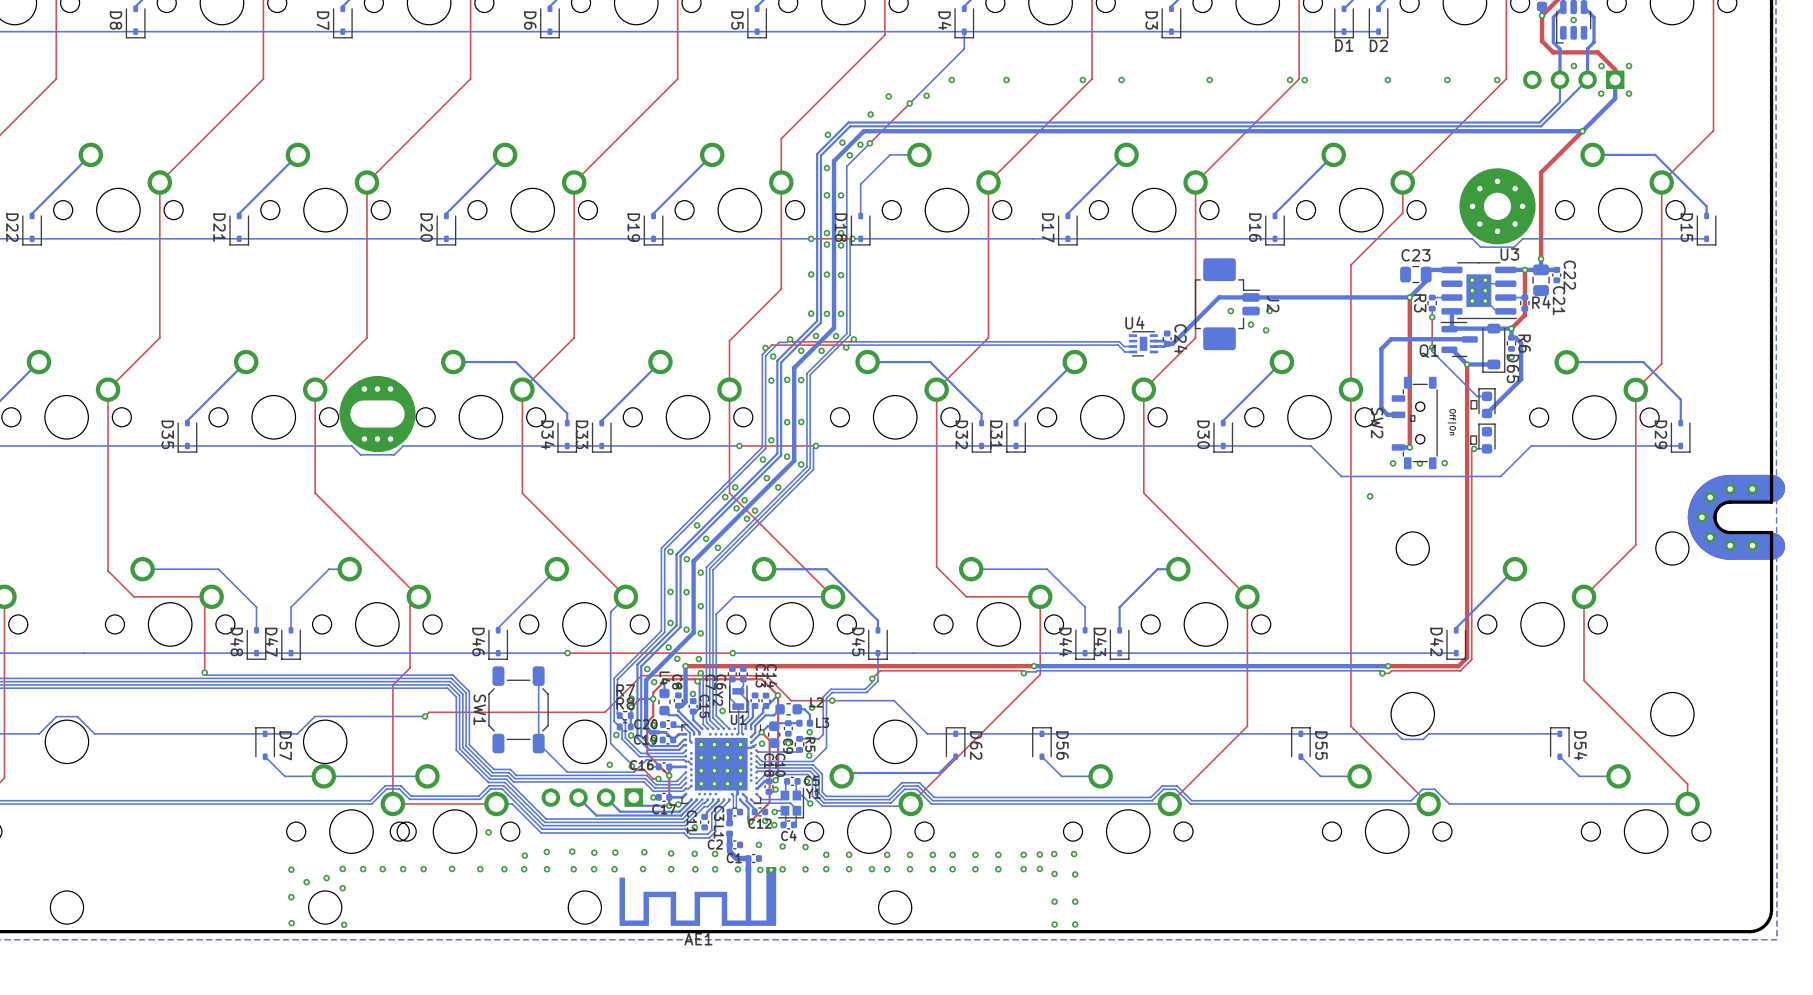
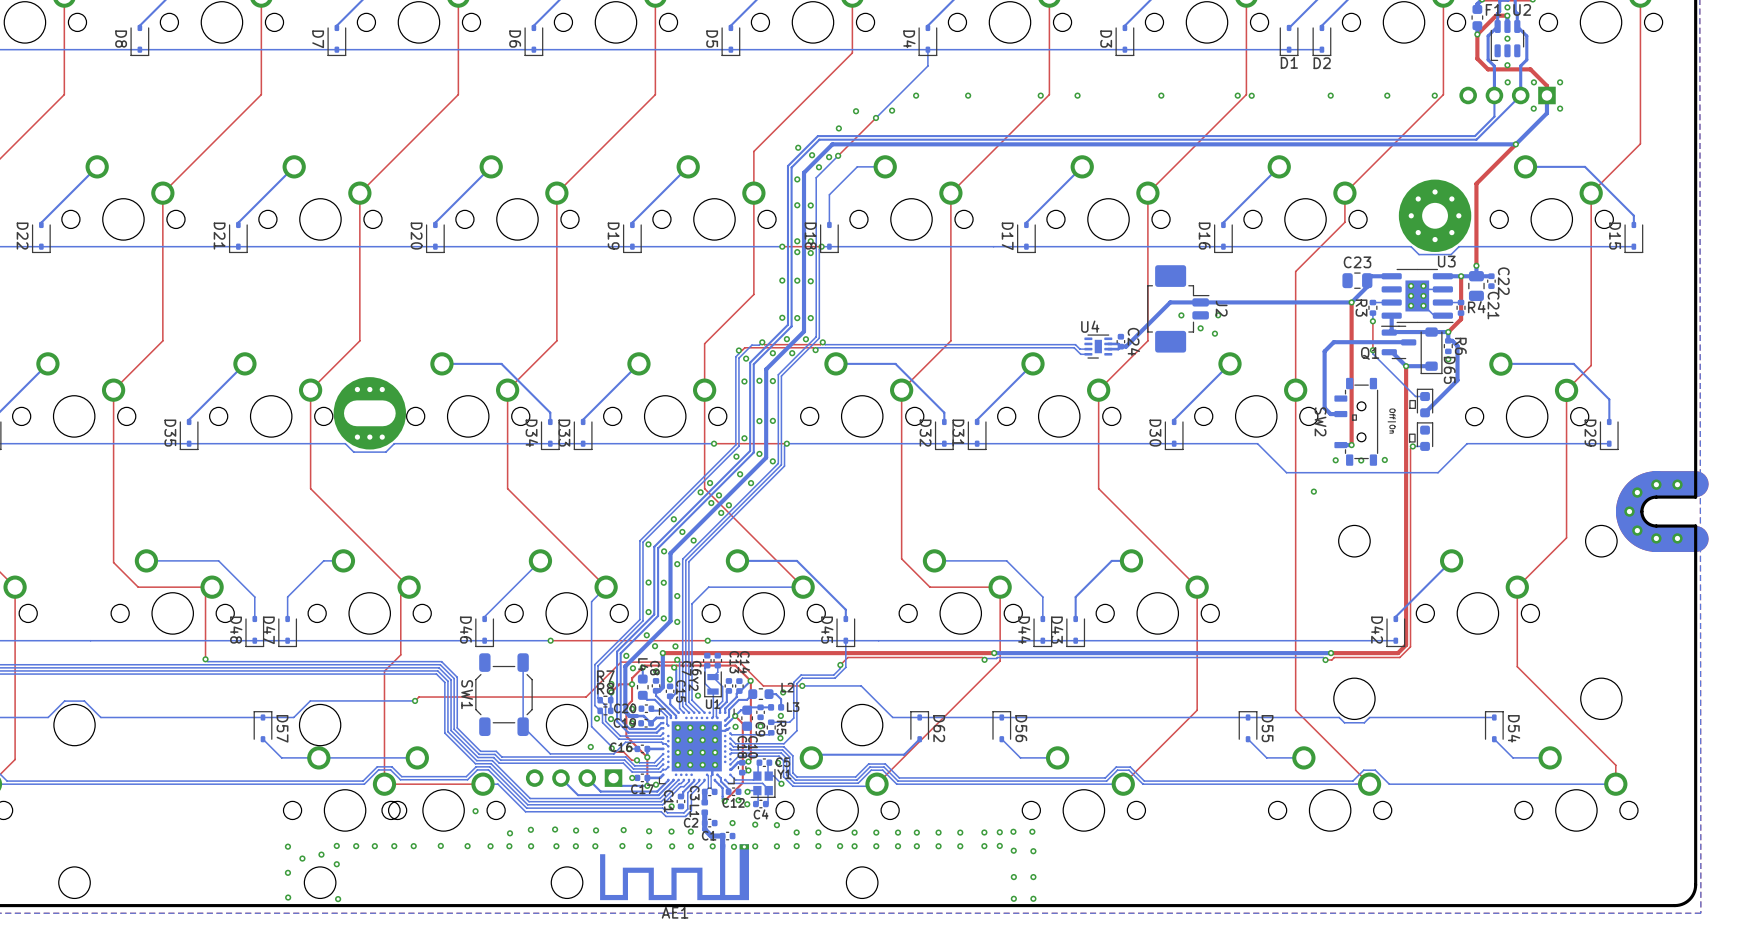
via: none -> (1507, 65)

